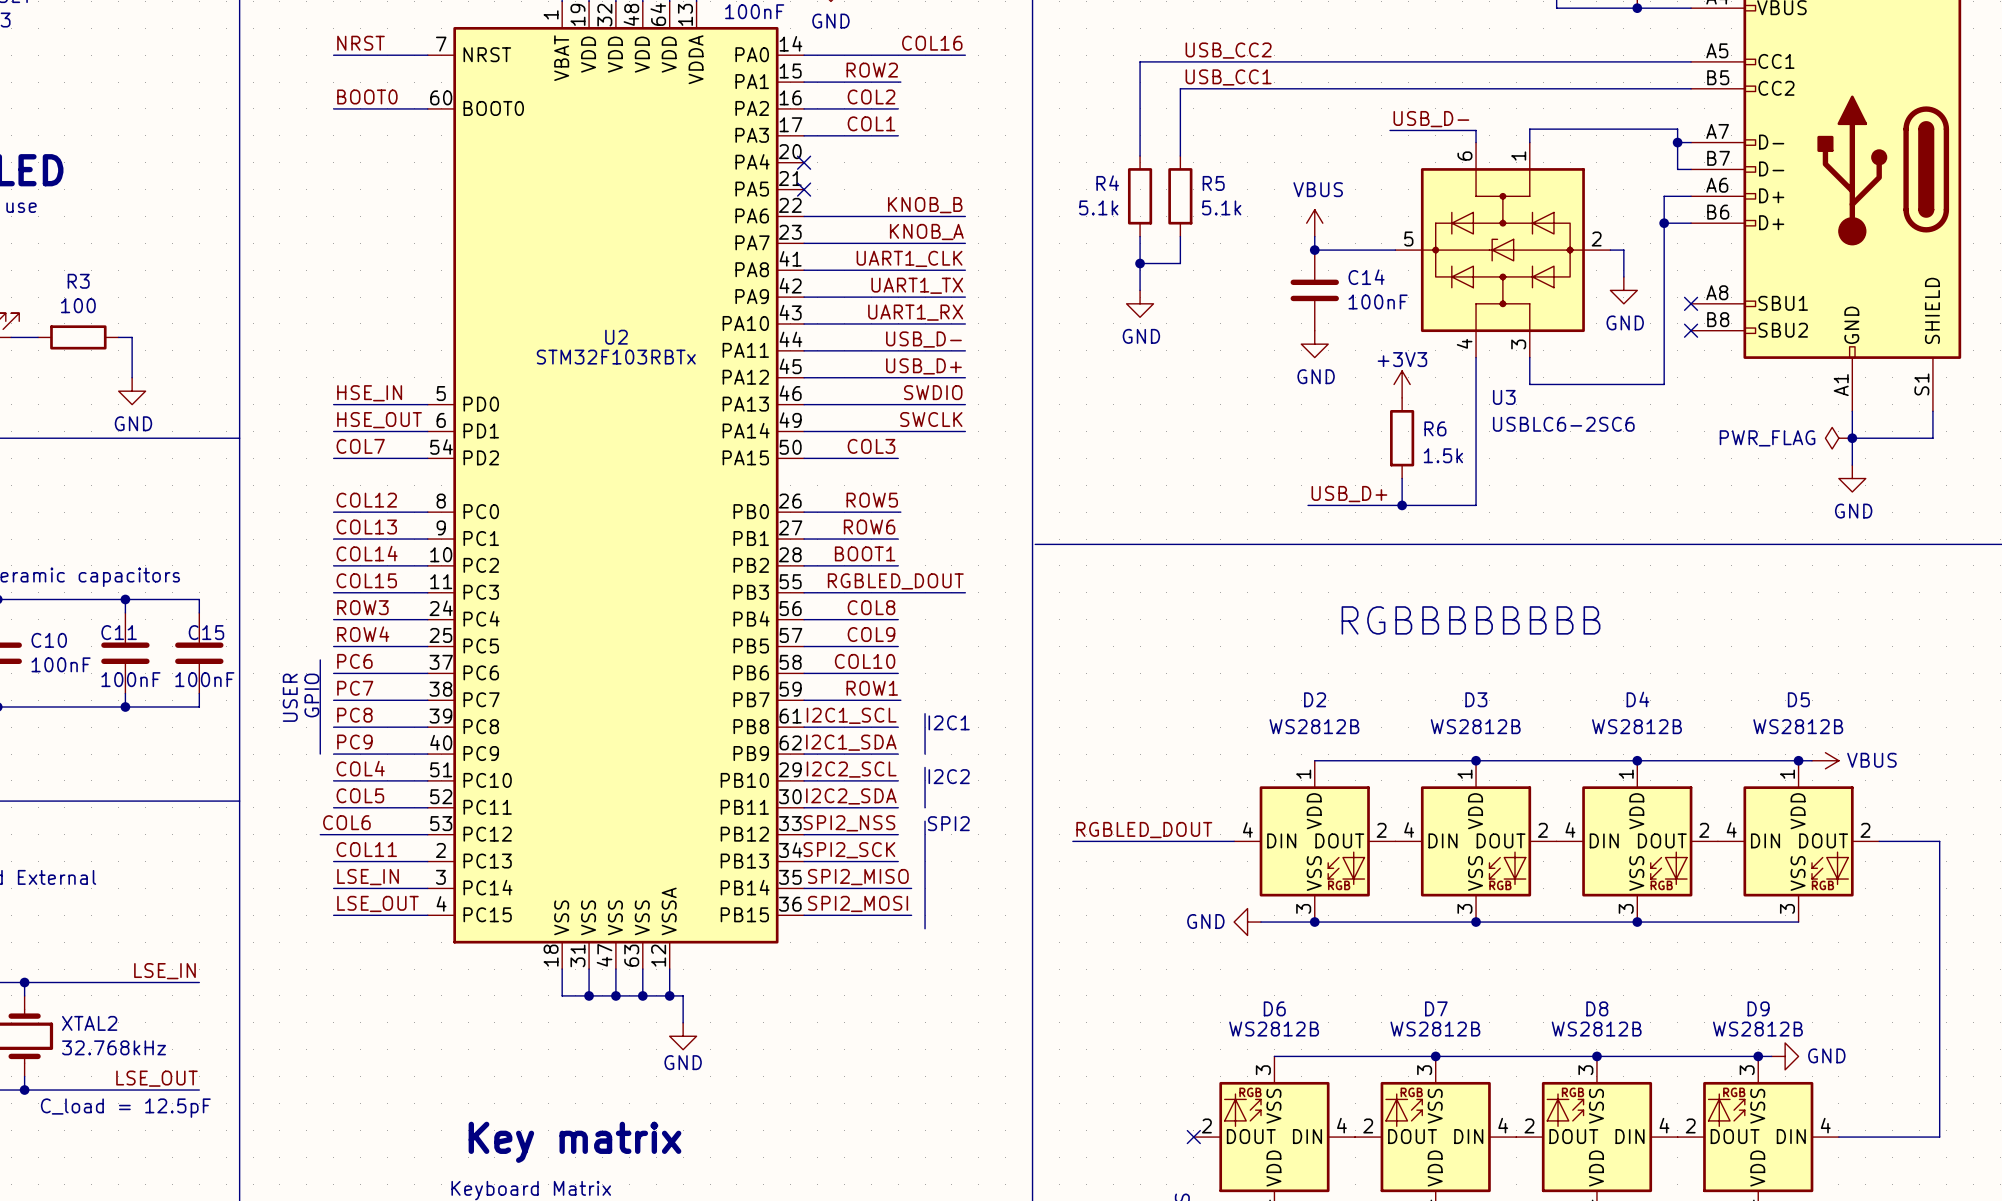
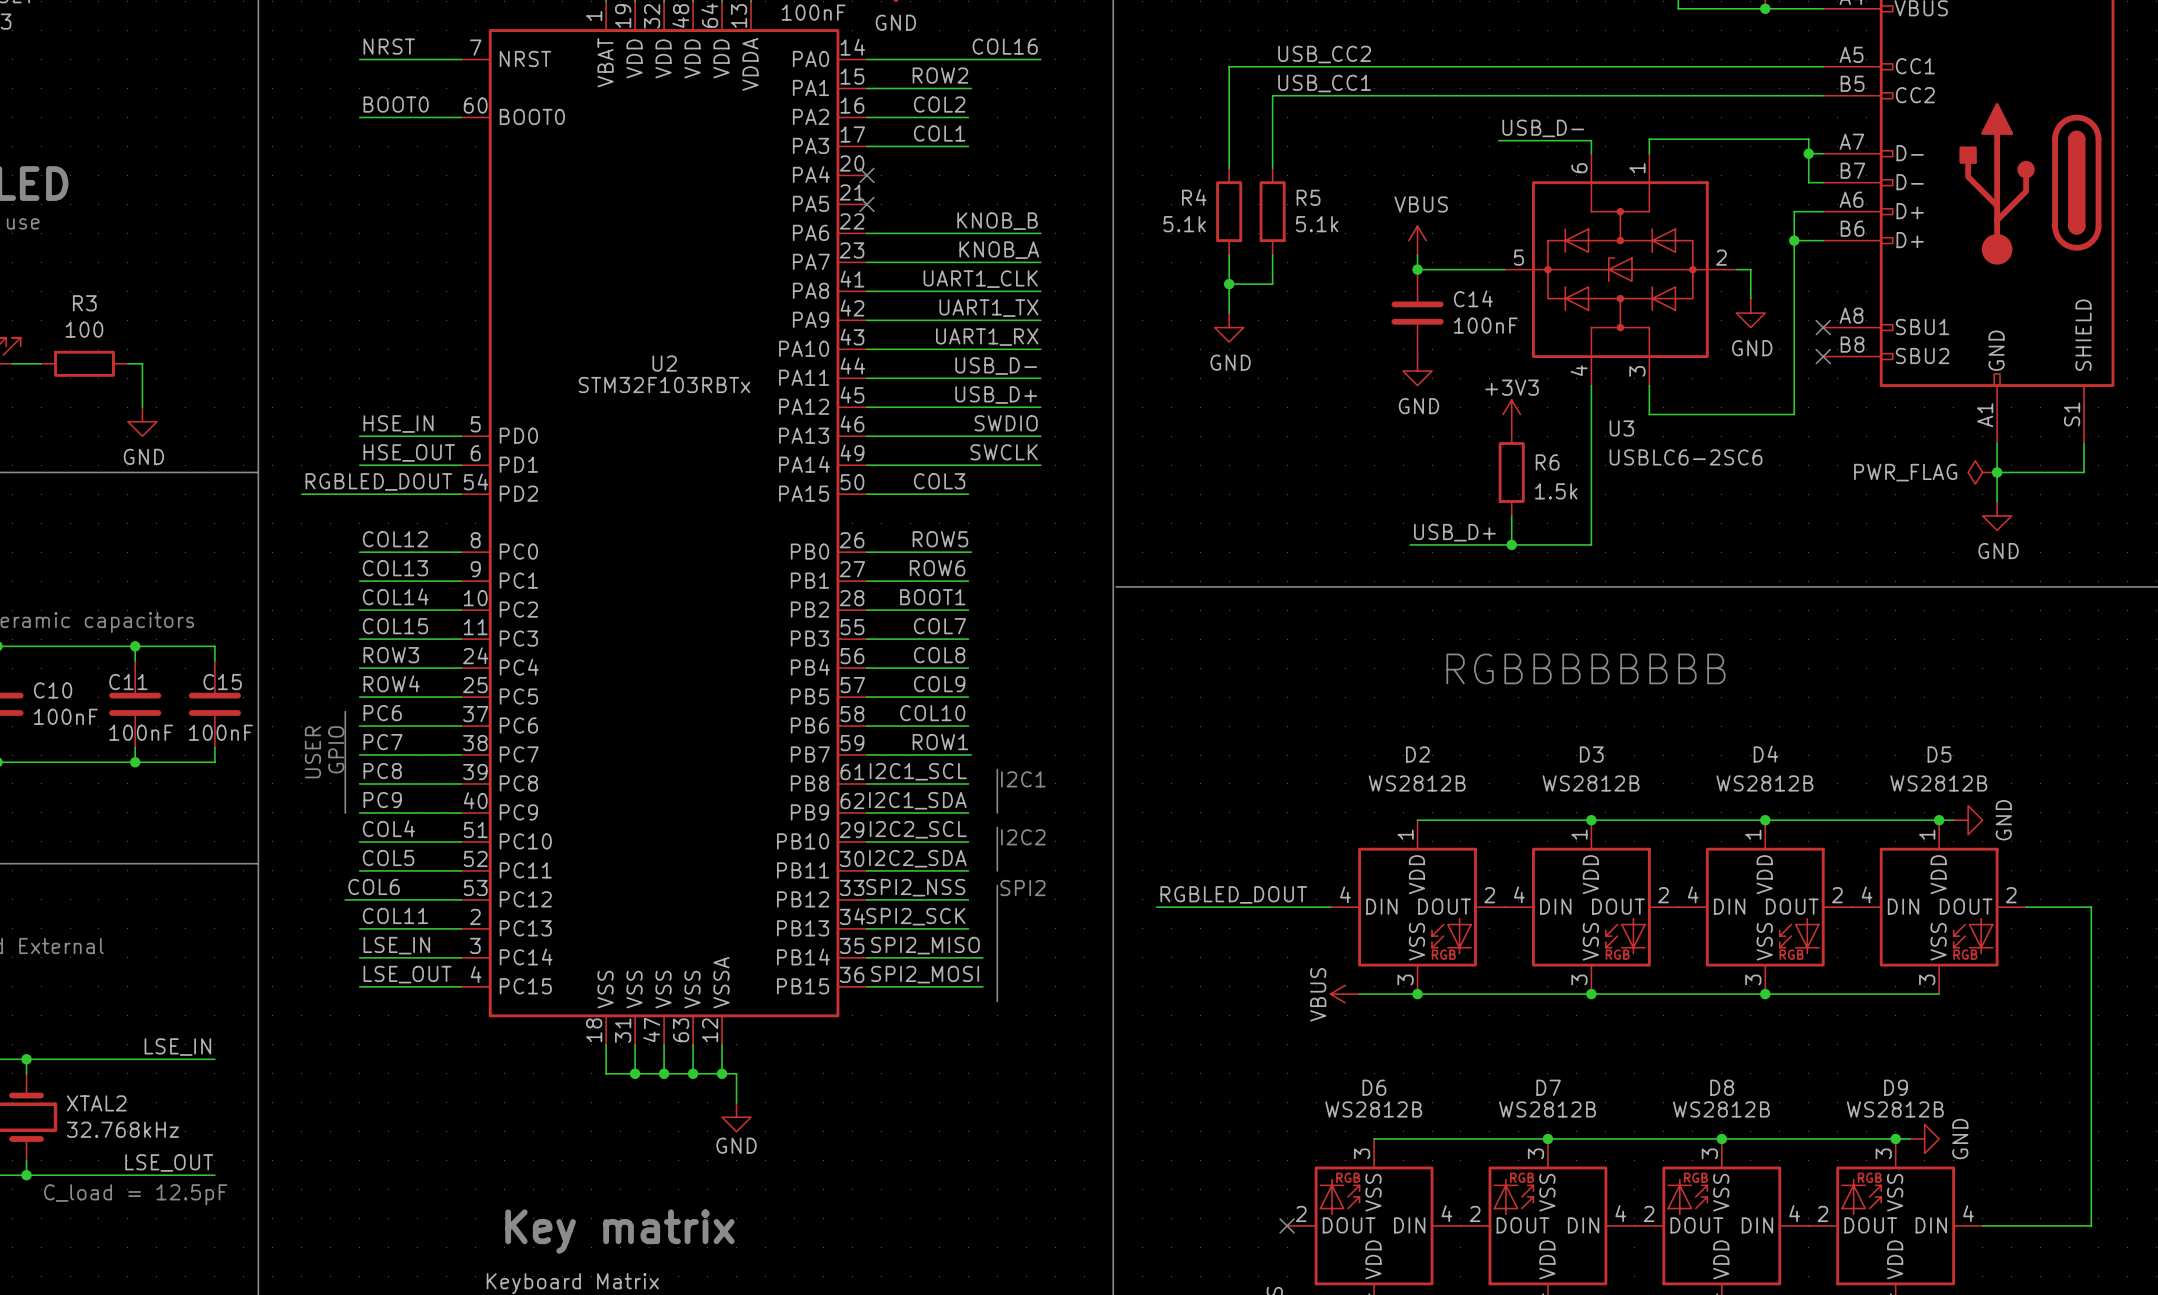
label: COL7 (360, 446) -> none
label: none -> RGBLED_DOUT (378, 481)
wire: none -> (301, 494) (359, 494)
label: none -> COL7 (939, 626)
label: RGBLED_DOUT (895, 581) -> none
wire: (898, 592) (965, 592) -> none
power symbol: VBUS (1825, 760) -> GND (1968, 820)
power symbol: GND (1247, 922) -> VBUS (1345, 994)
power symbol text rotation: 0° (1826, 1055) -> 90° counterclockwise (1960, 1138)

